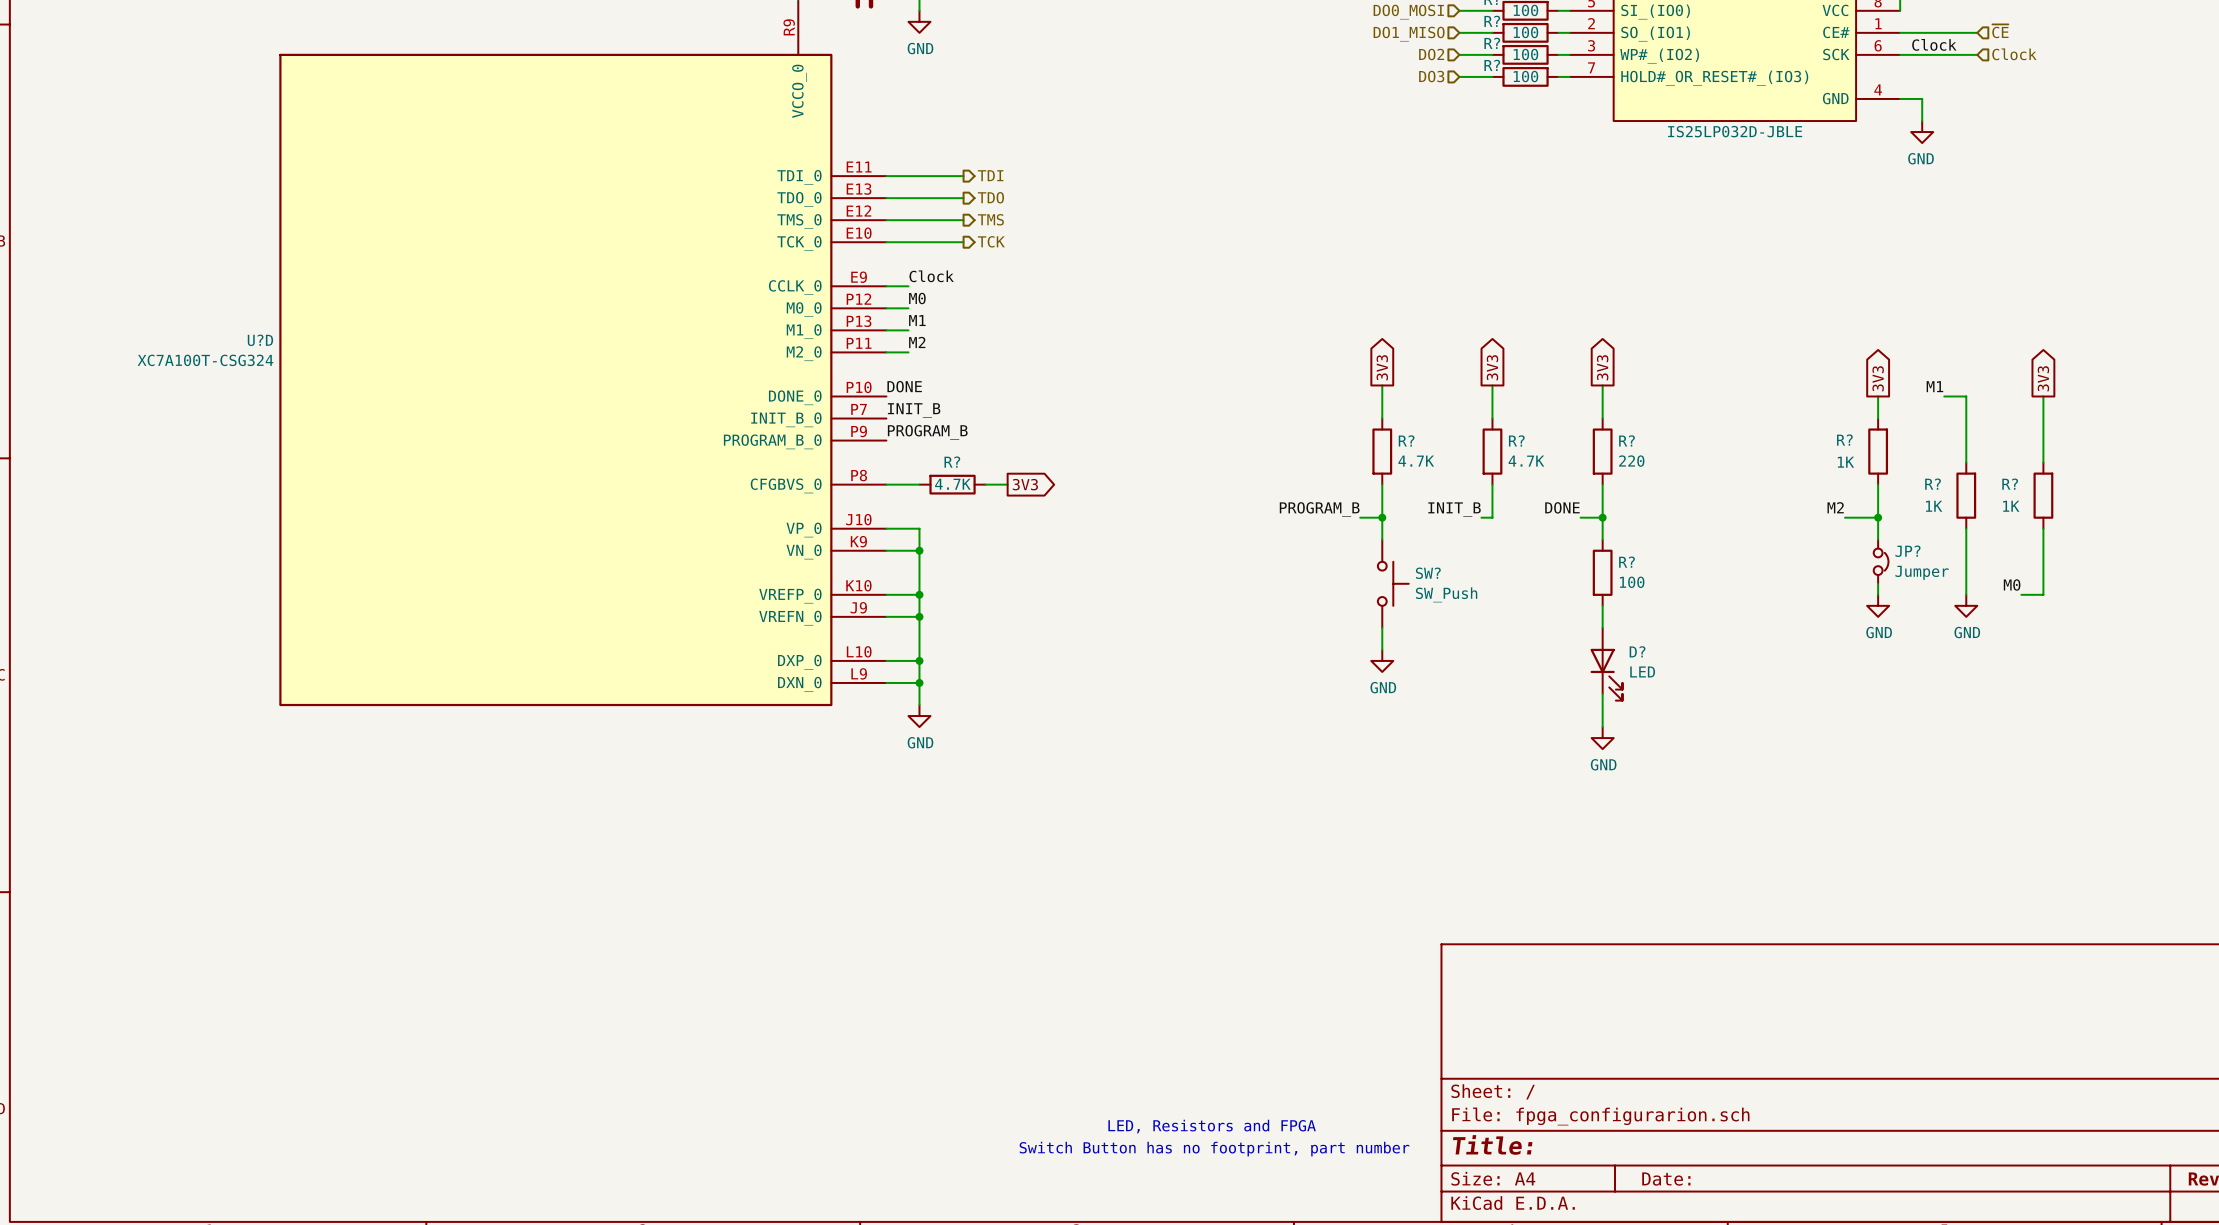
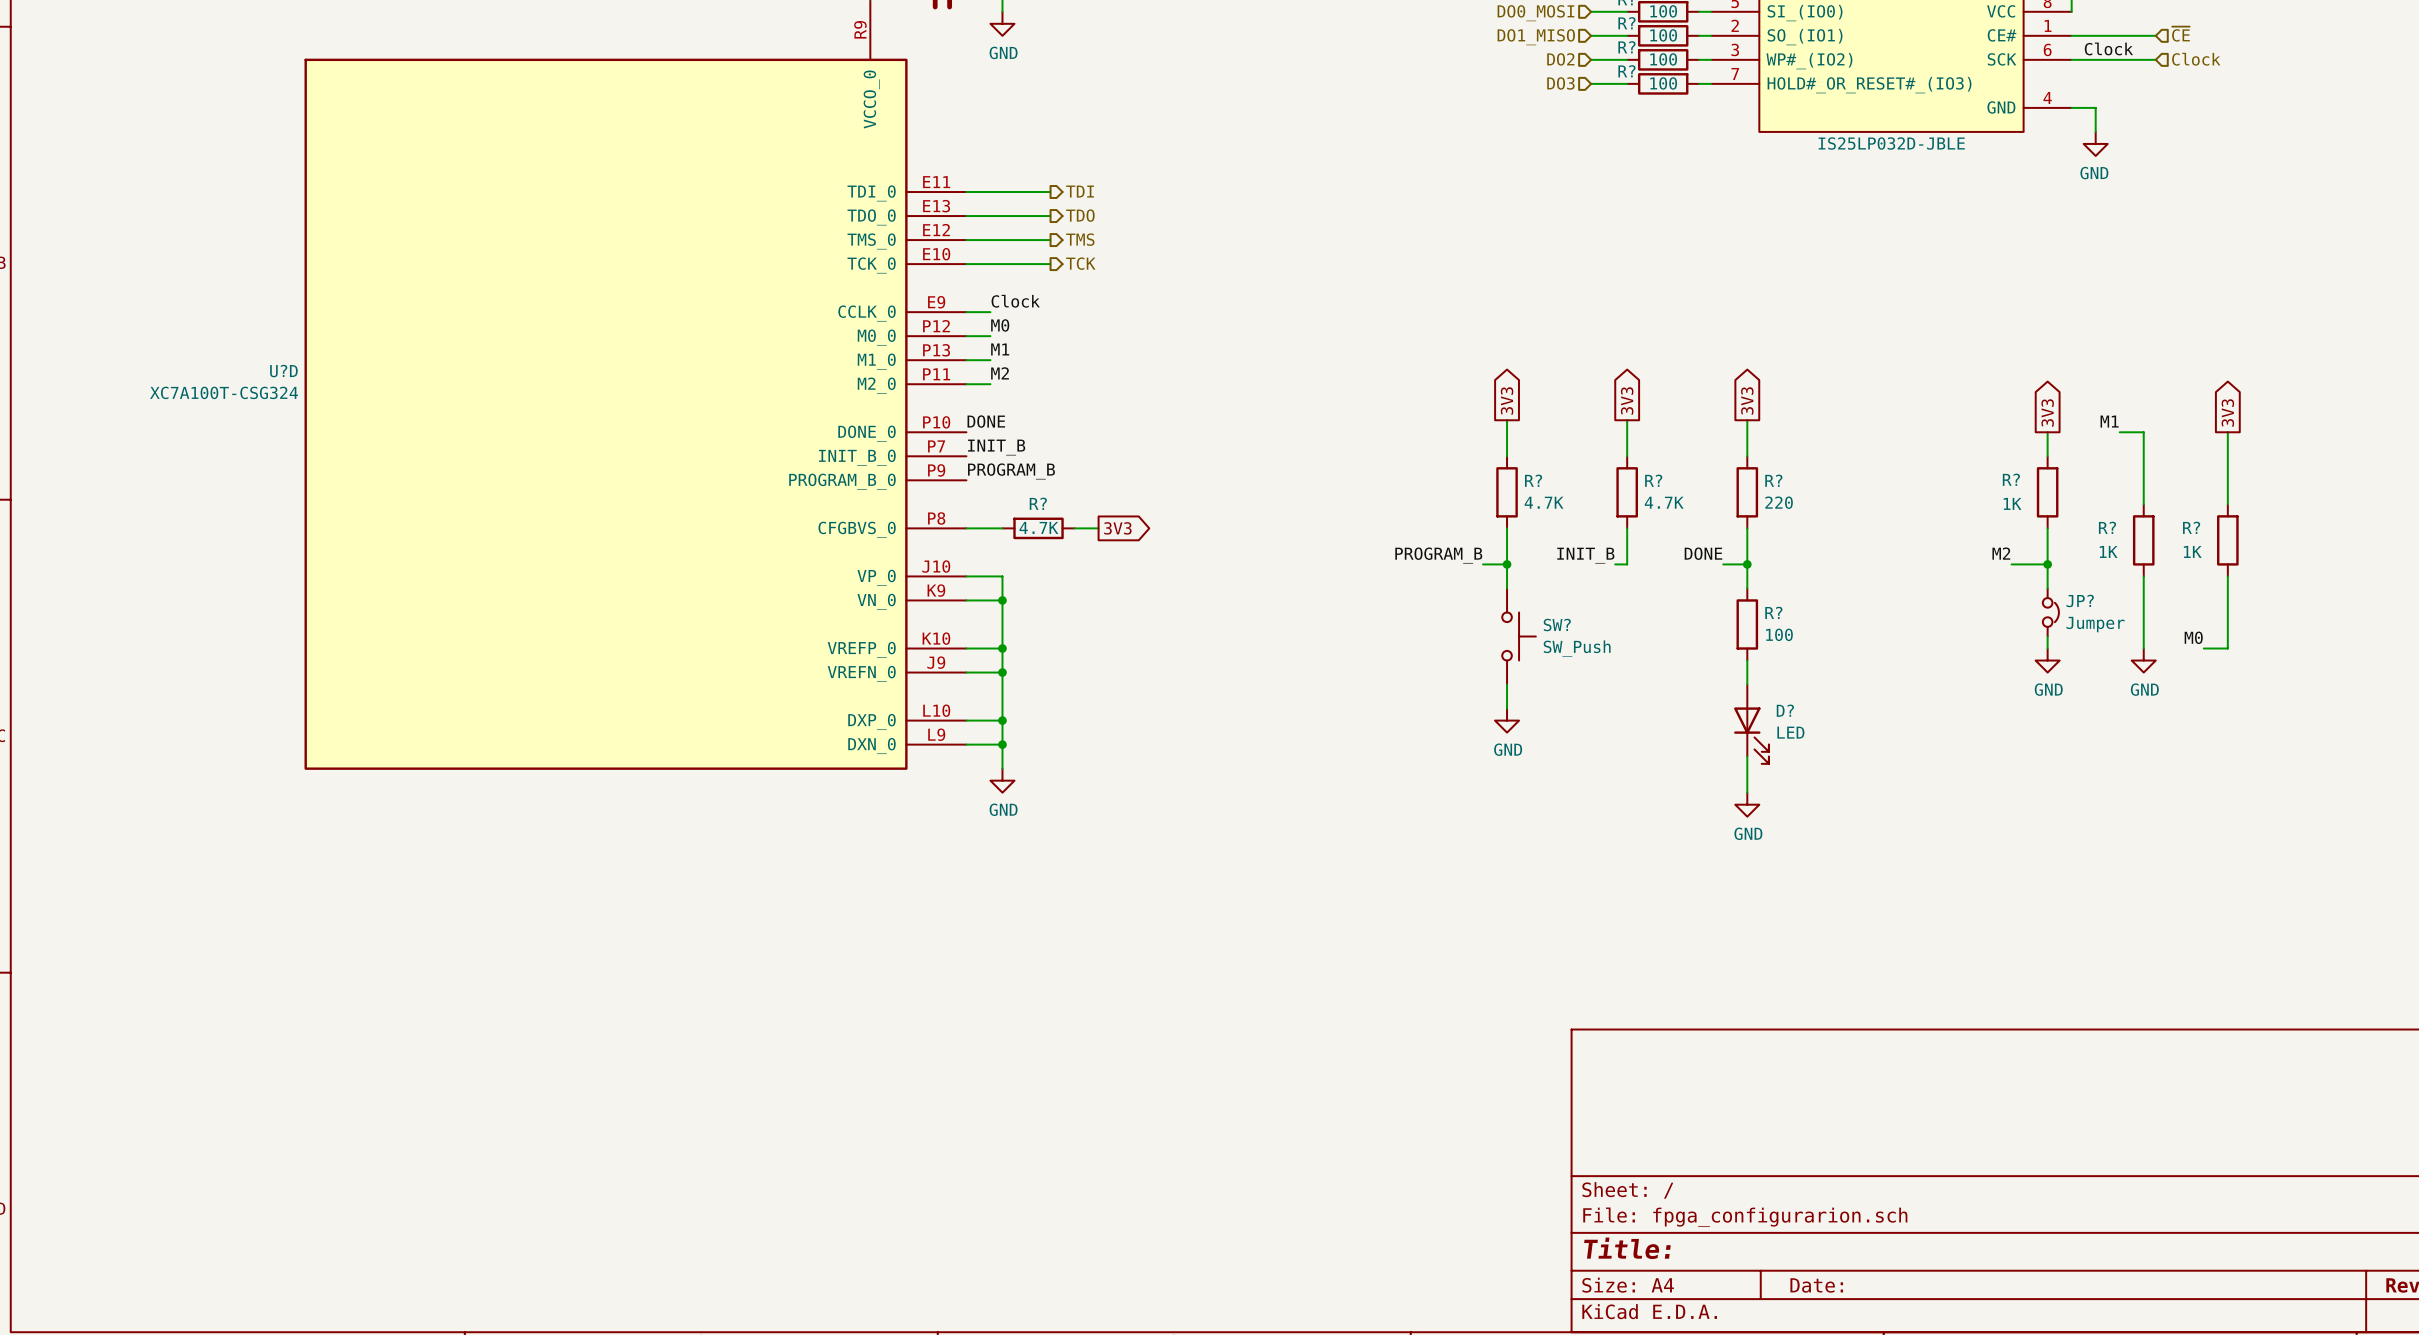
text: LED, Resistors and FPGA (1212, 1126) -> none
text: Switch Button has no footprint, part number (1214, 1149) -> none

